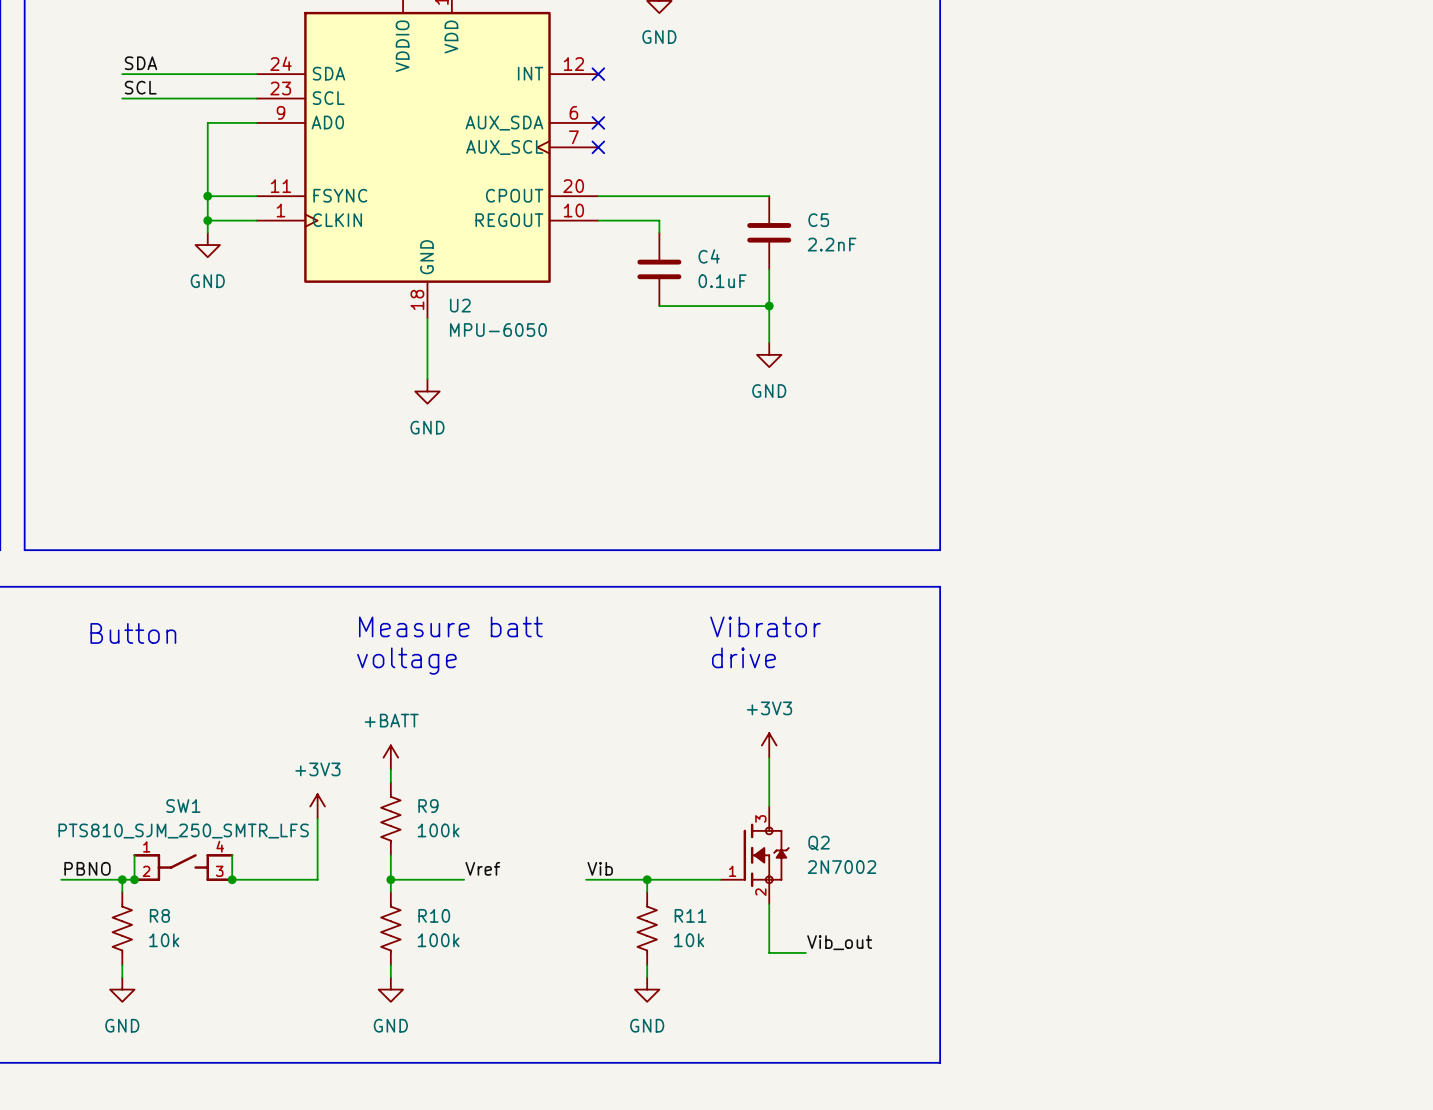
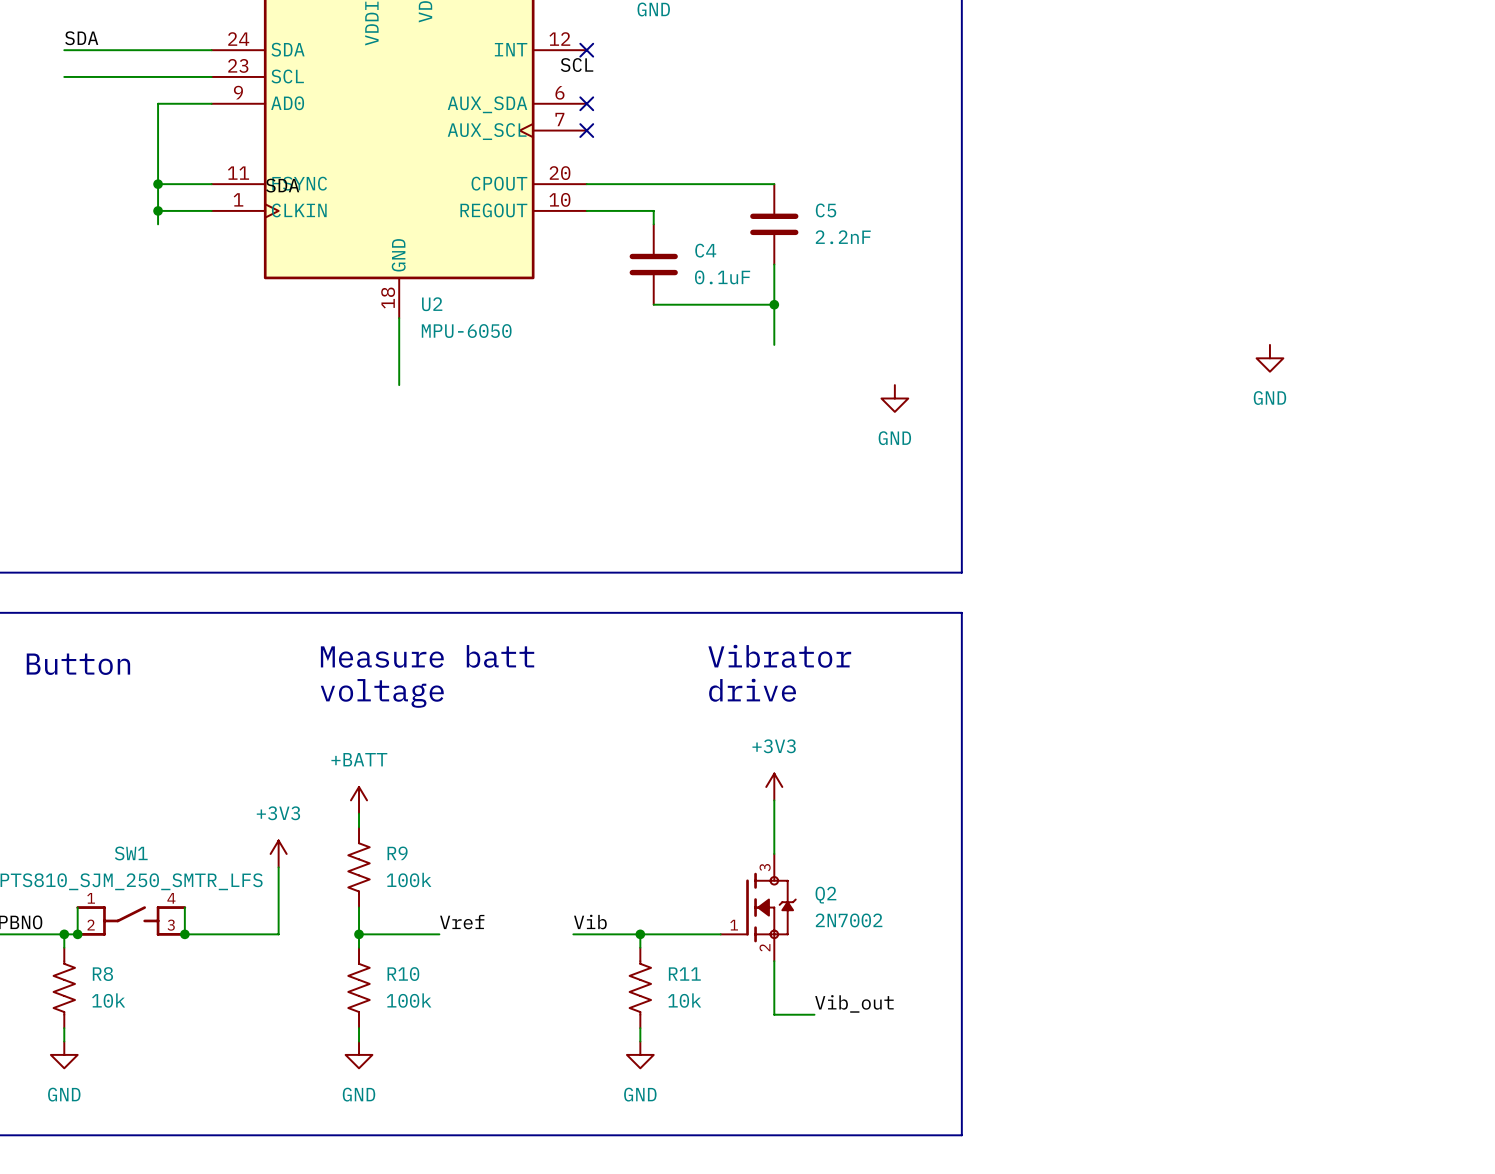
label: SCL (140, 87) -> none
label: none -> SCL (577, 65)
label: none -> SDA (282, 185)
power symbol: GND (207, 245) -> none
power symbol position: GND (769, 354) -> GND (894, 398)
power symbol: none -> GND (1269, 358)
power symbol: GND (427, 391) -> none

